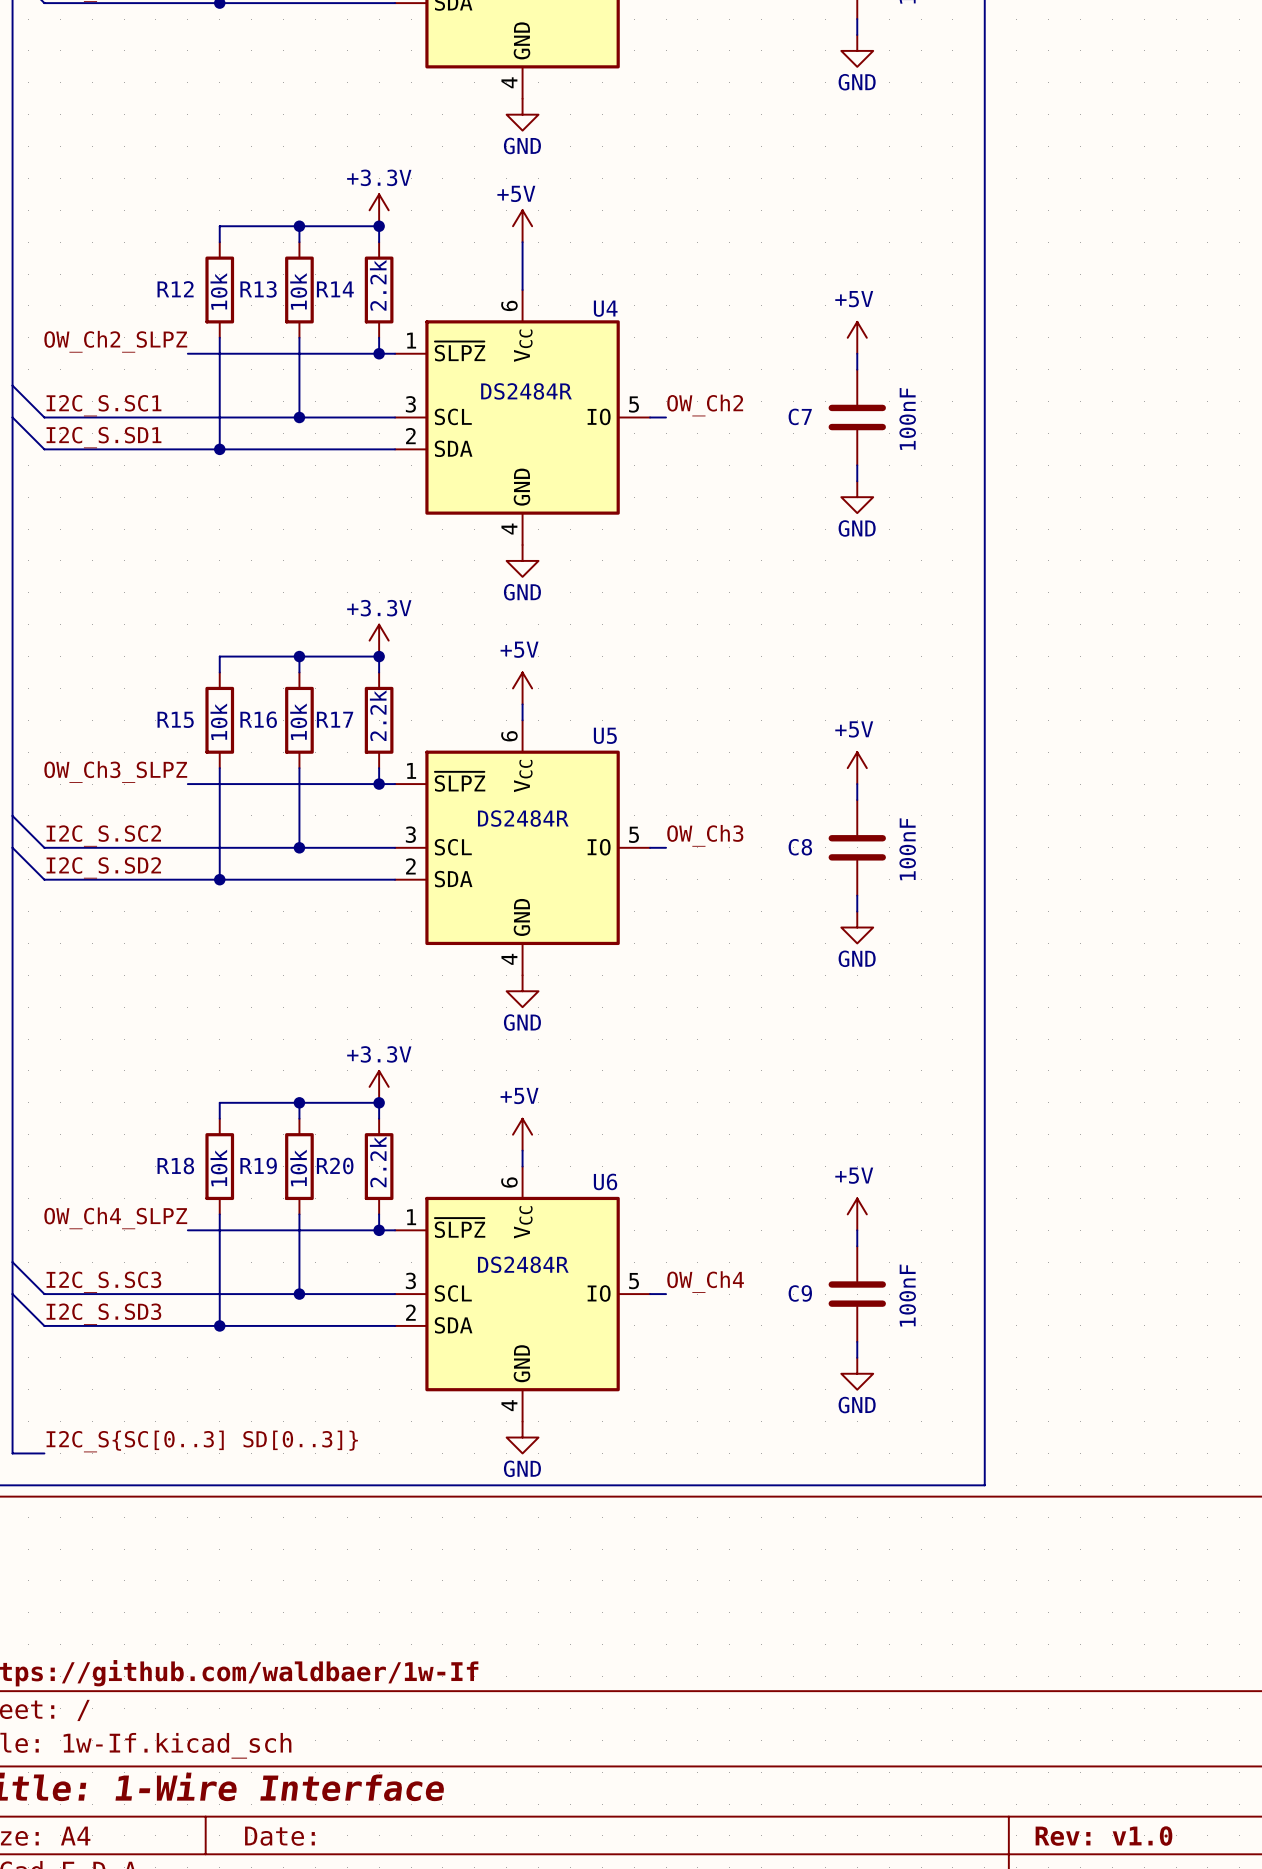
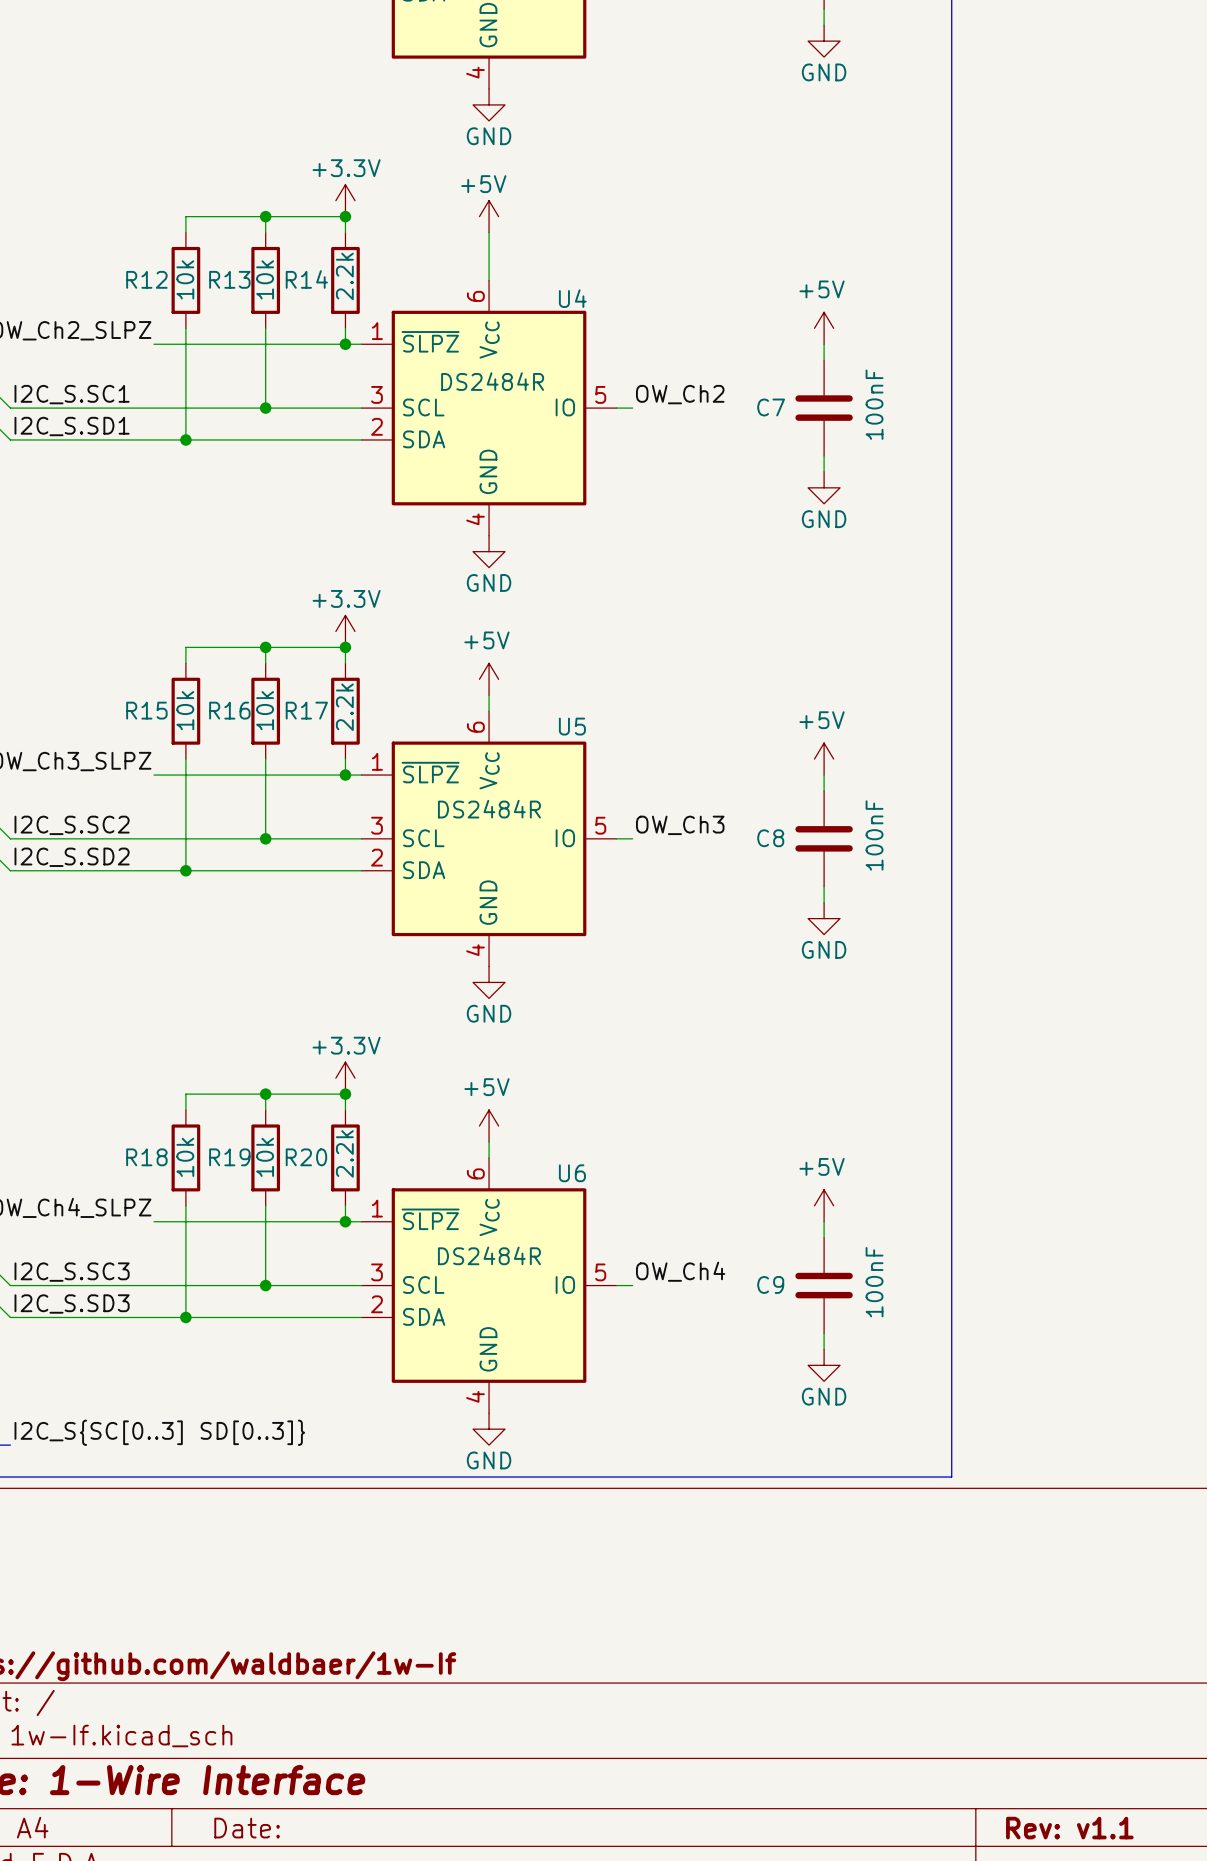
title block: Rev: v1.0 (1103, 1836) -> Rev: v1.1 (1069, 1828)

